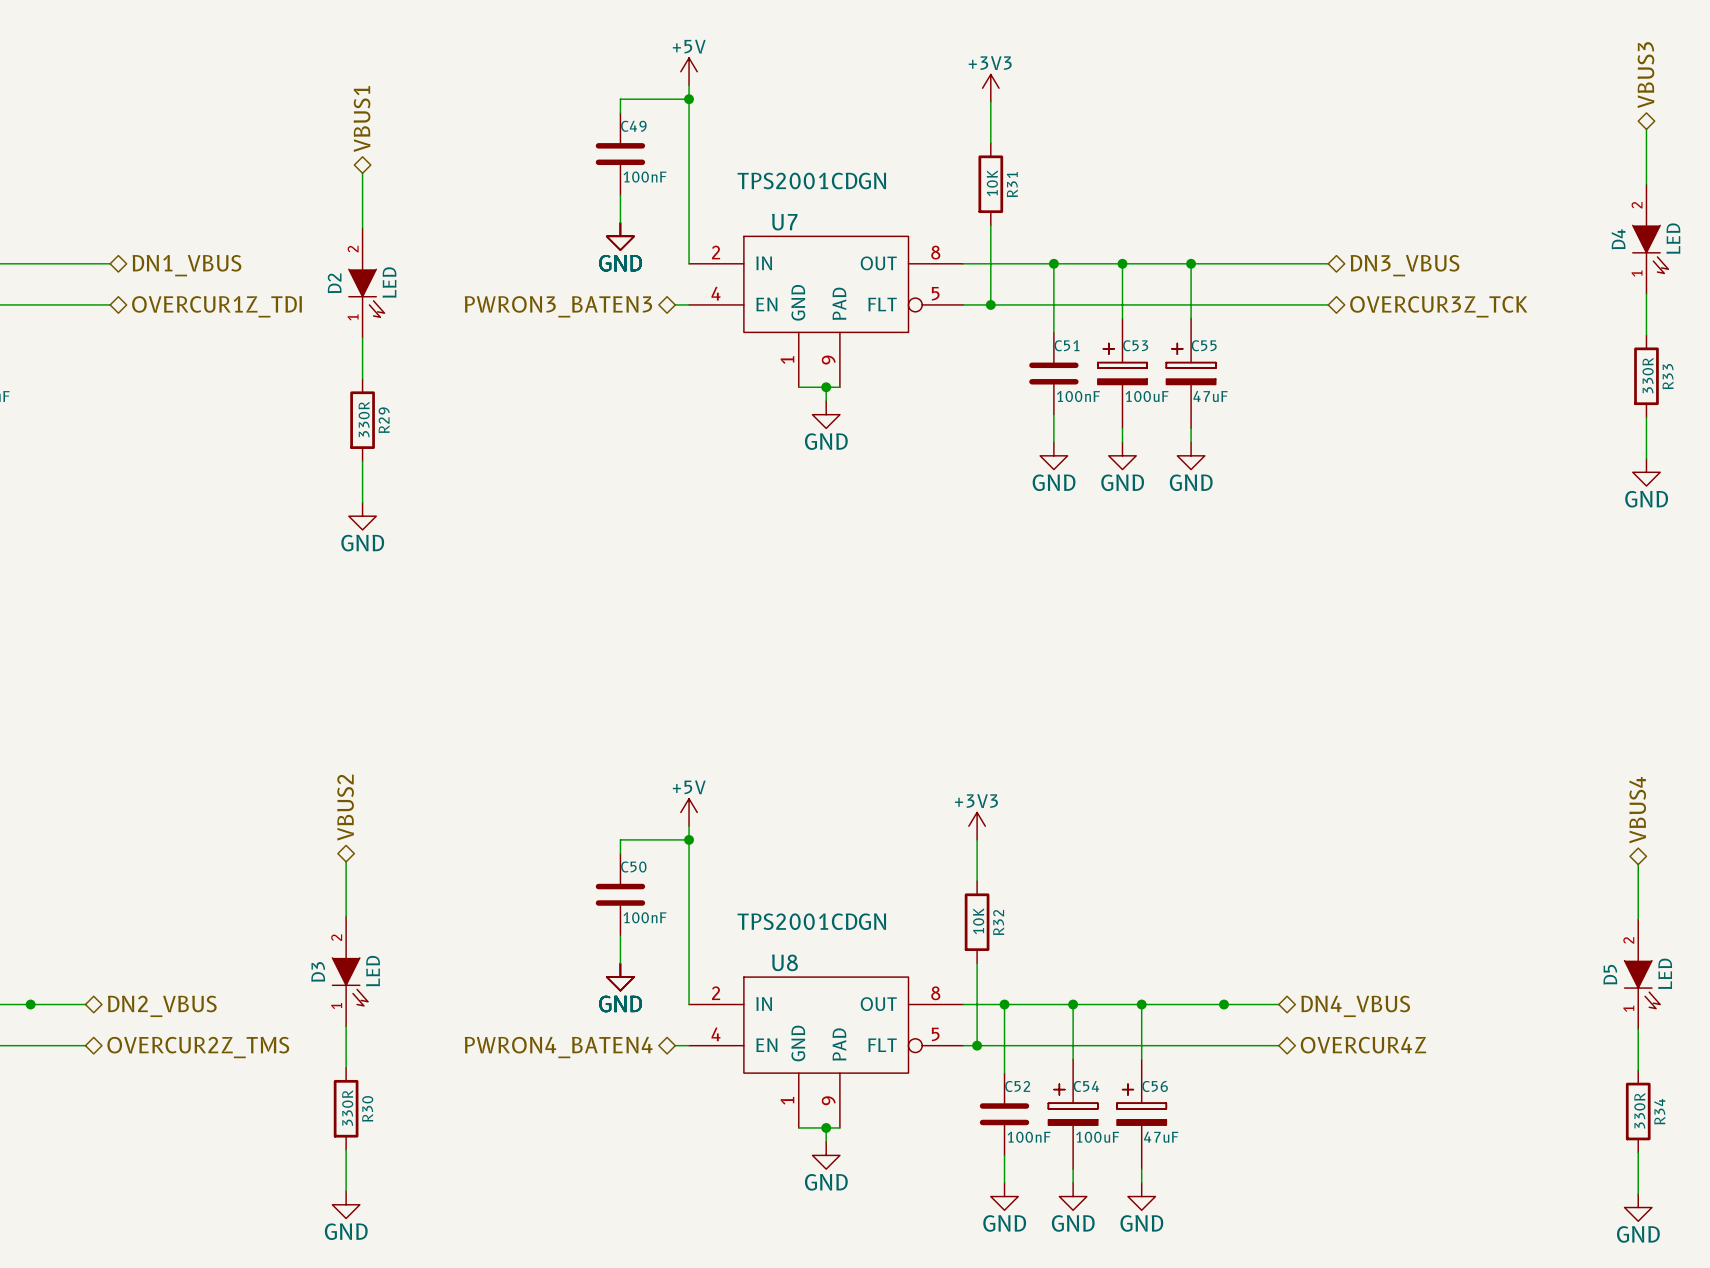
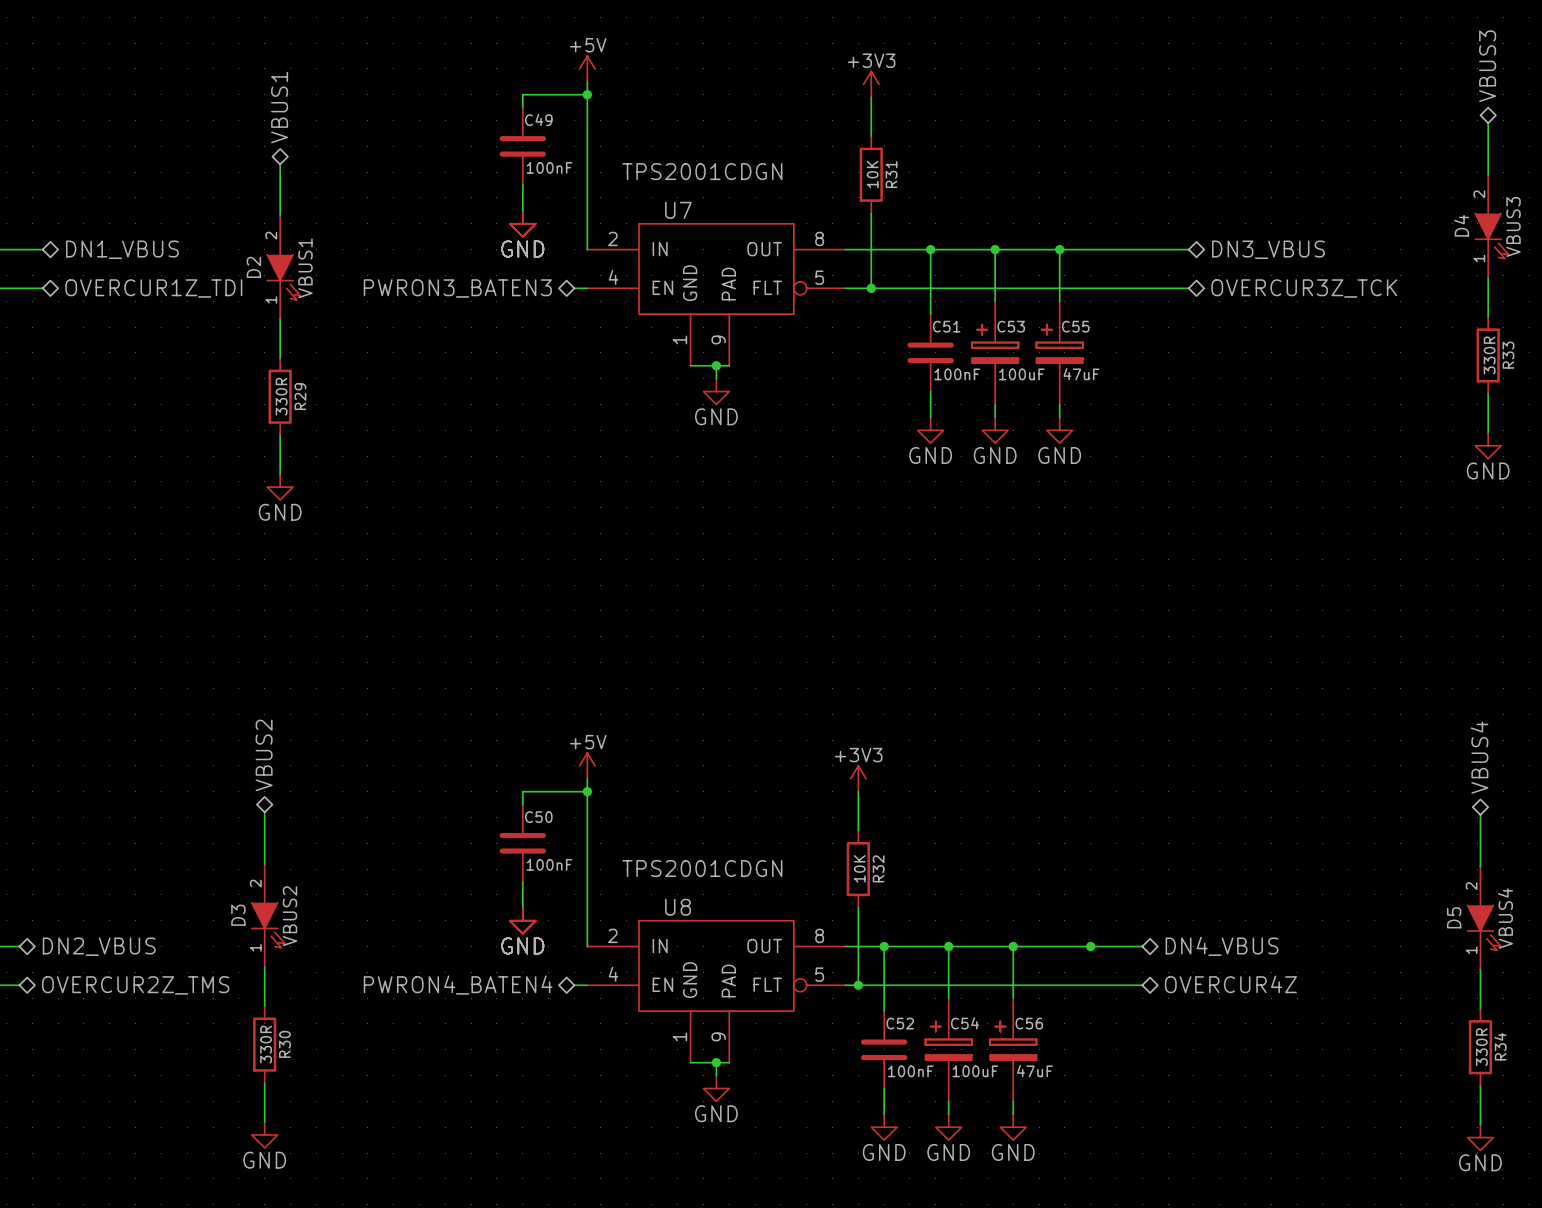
D4 value: LED (1673, 238) -> VBUS3 (1513, 226)
D2 value: LED (389, 282) -> VBUS1 (305, 268)
D3 value: LED (373, 971) -> VBUS2 (290, 916)
D5 value: LED (1665, 973) -> VBUS4 (1505, 918)

